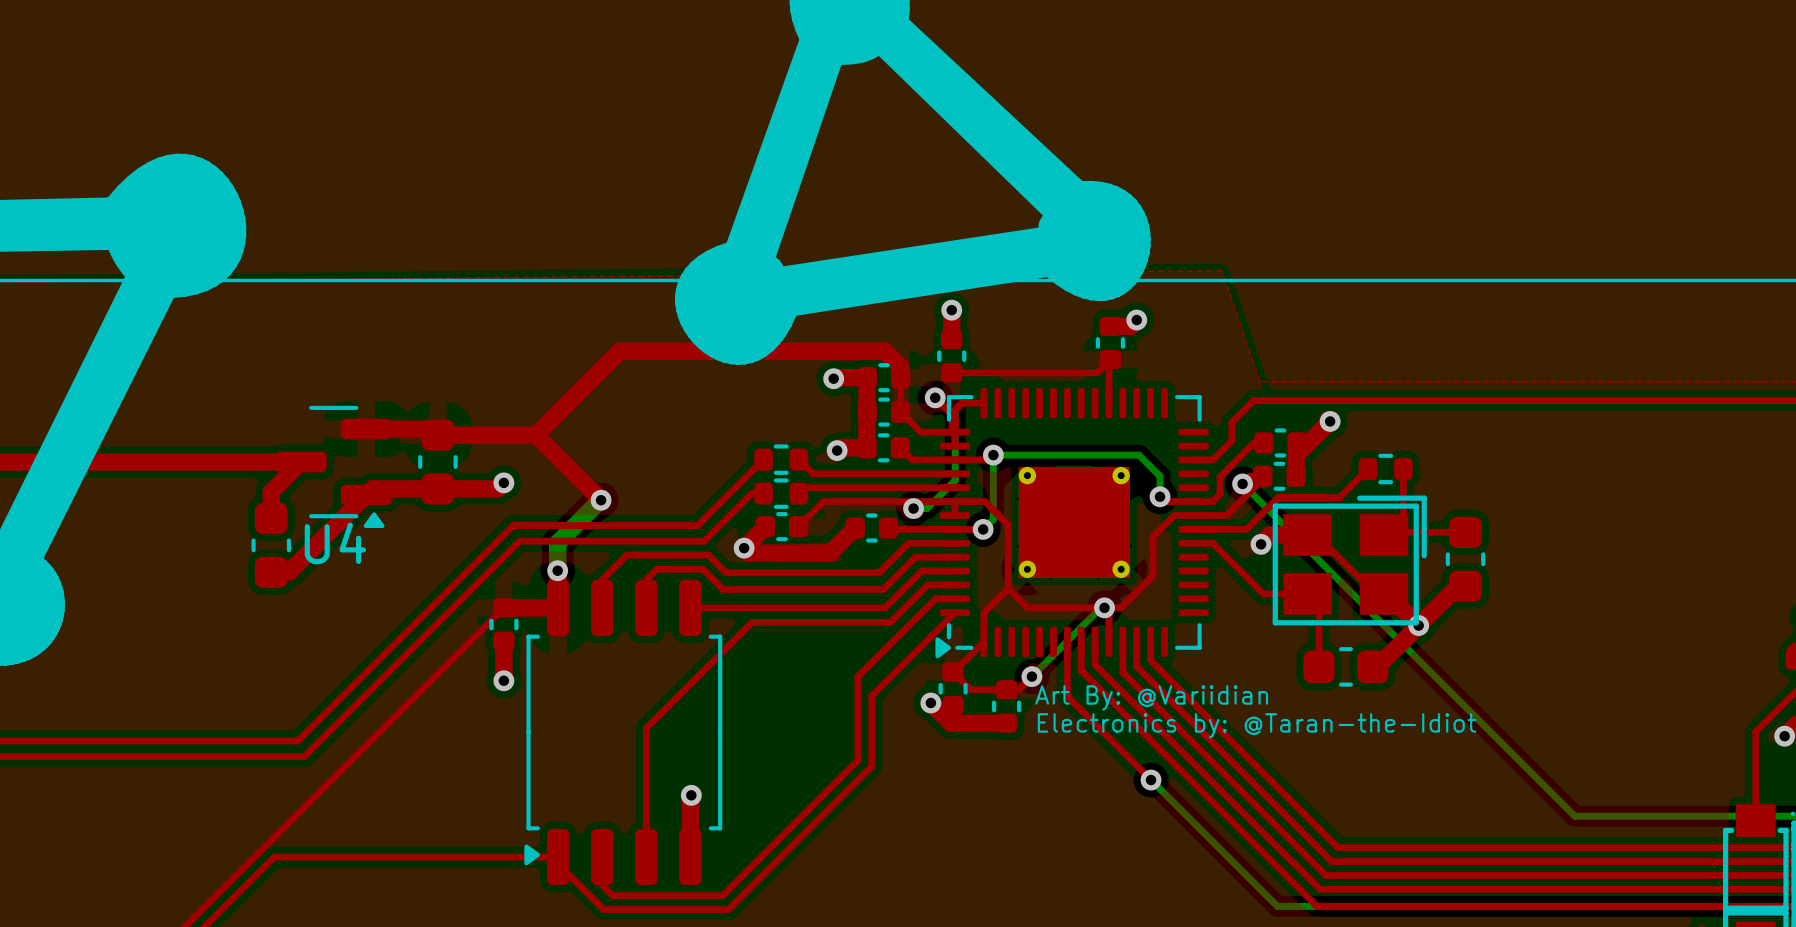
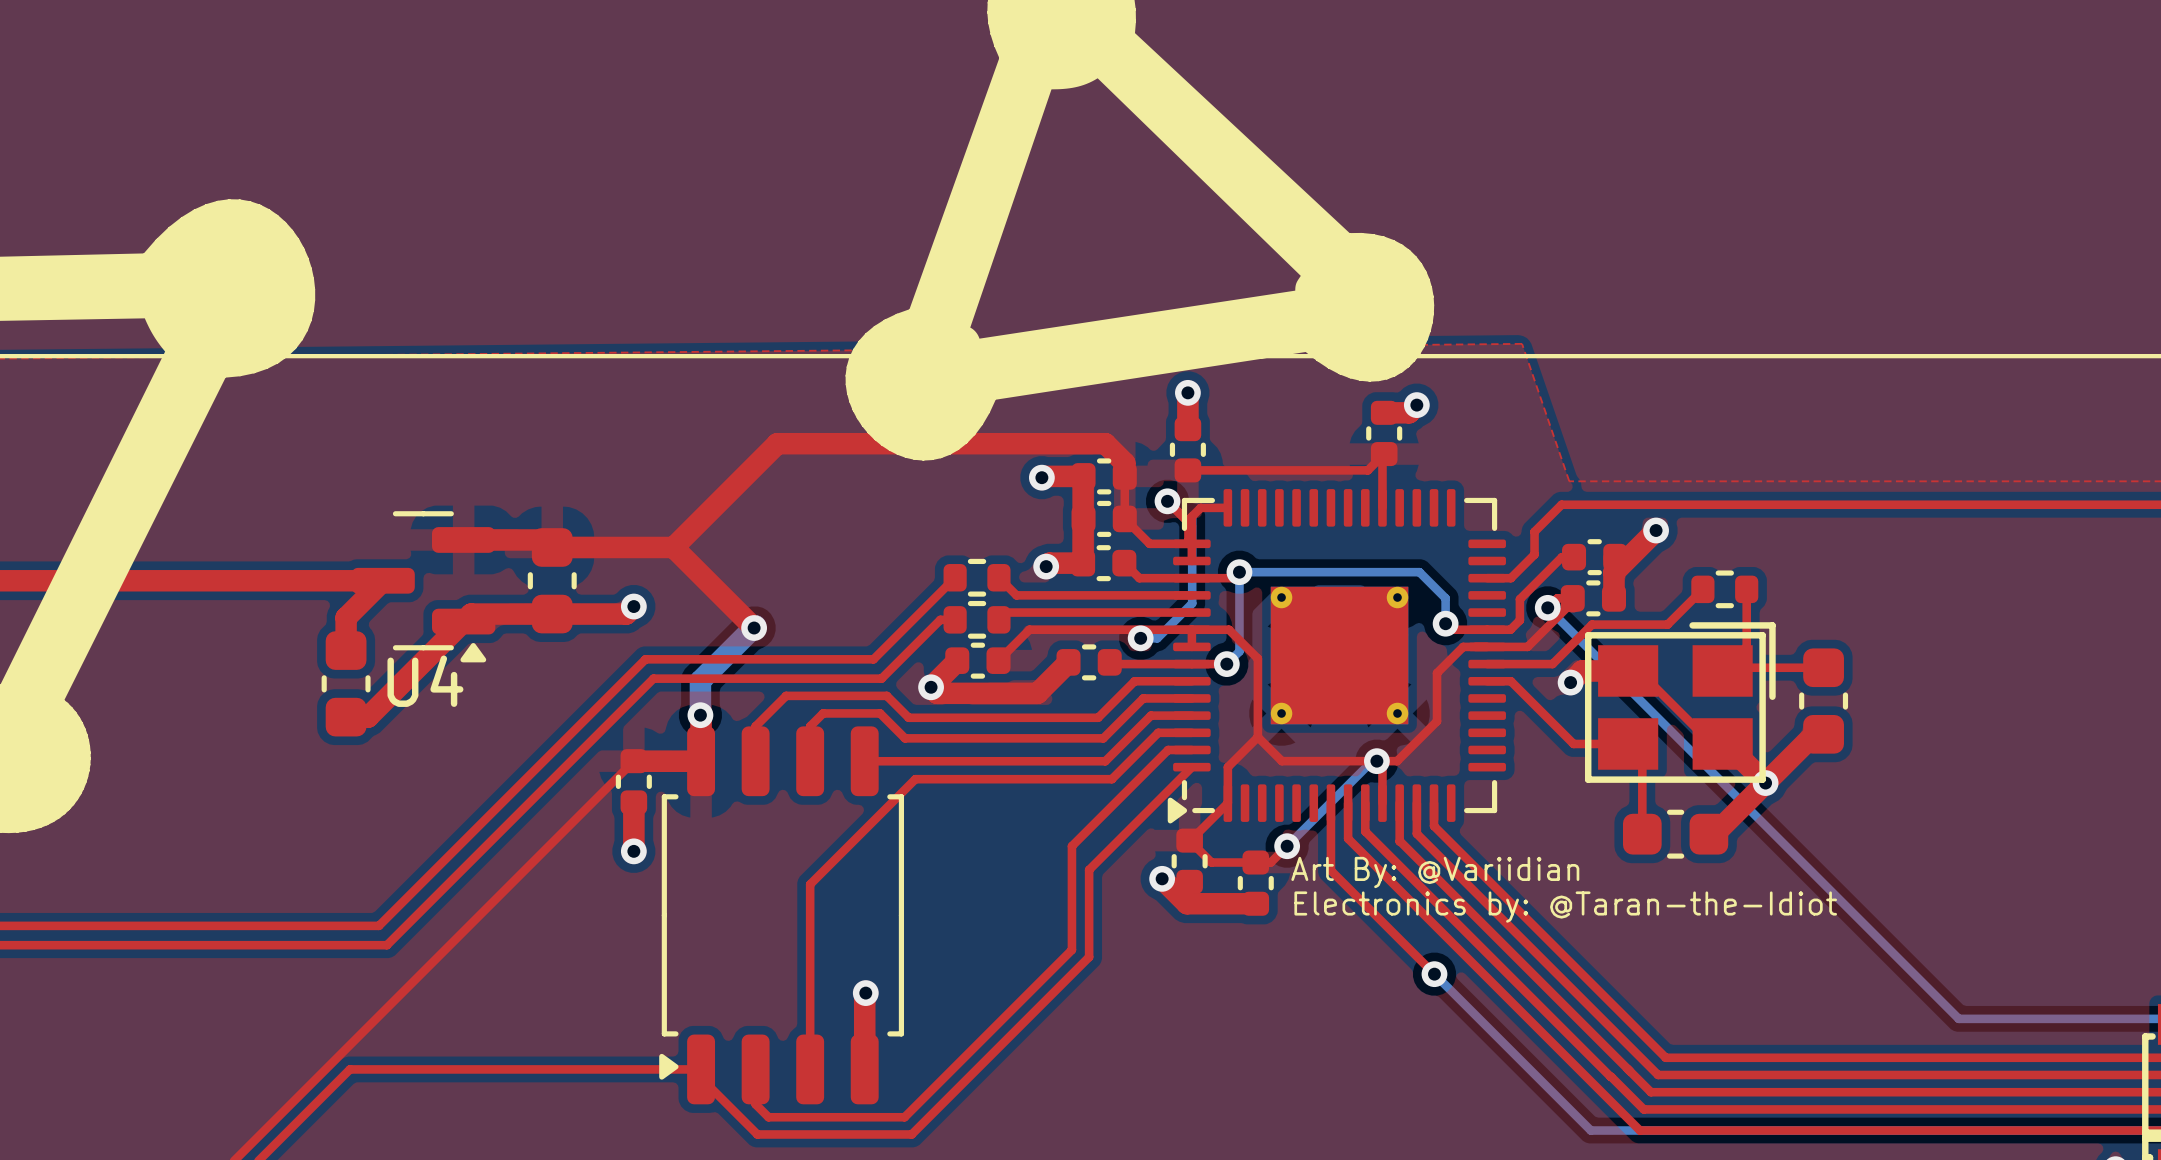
top track: (752, 622) (646, 728) -> (940, 779) (915, 779) (810, 884) (810, 909)

